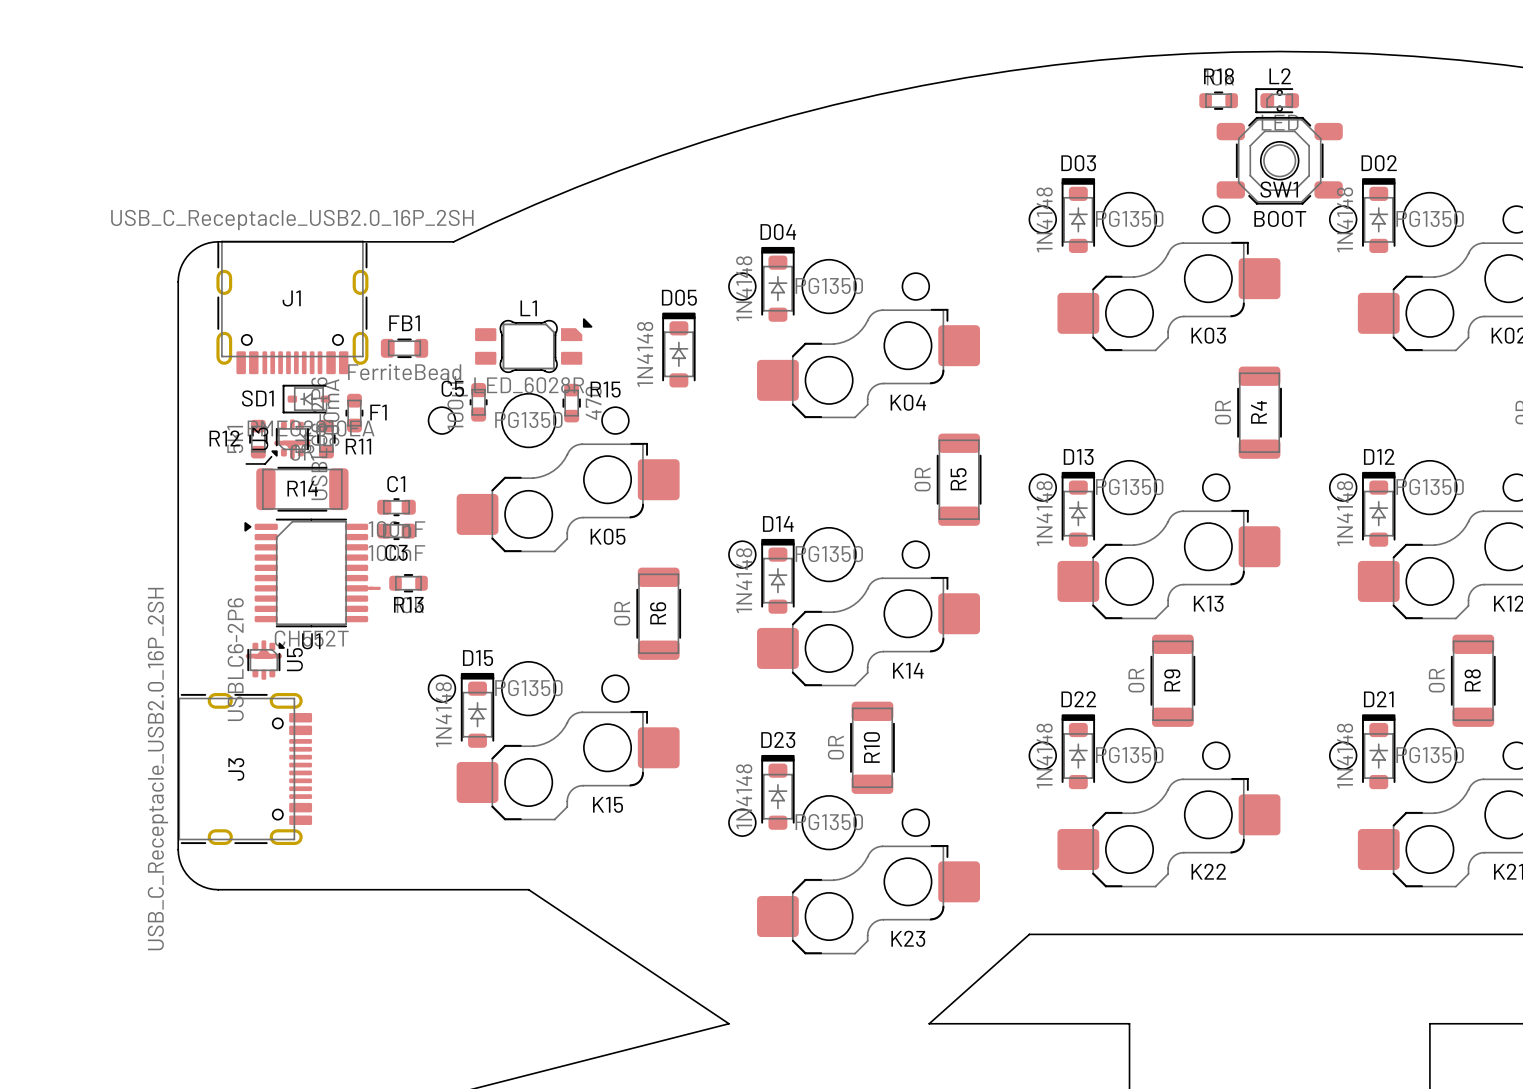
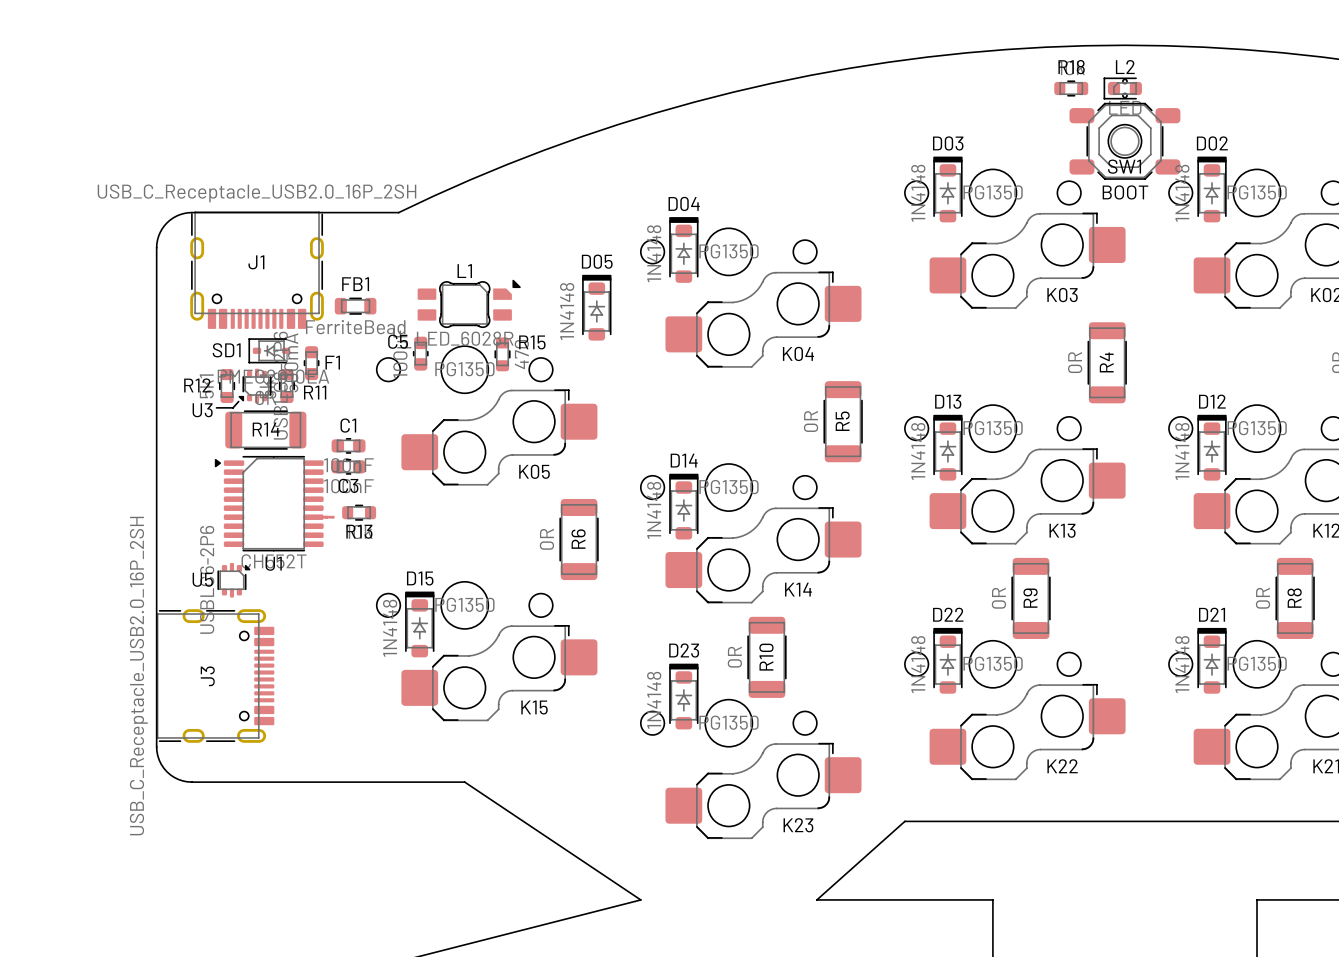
U3 footprint: [271, 419, 311, 459] -> [238, 368, 272, 404]
U3 name rotation: 0° (260, 438) -> 90° clockwise (202, 410)
U3 name position: U3 (260, 438) -> U3 (202, 410)
U5 footprint: [245, 640, 285, 680] -> [217, 562, 251, 598]
U5 name rotation: 0° (294, 659) -> 90° clockwise (202, 579)
U5 name position: U5 (294, 659) -> U5 (202, 579)

